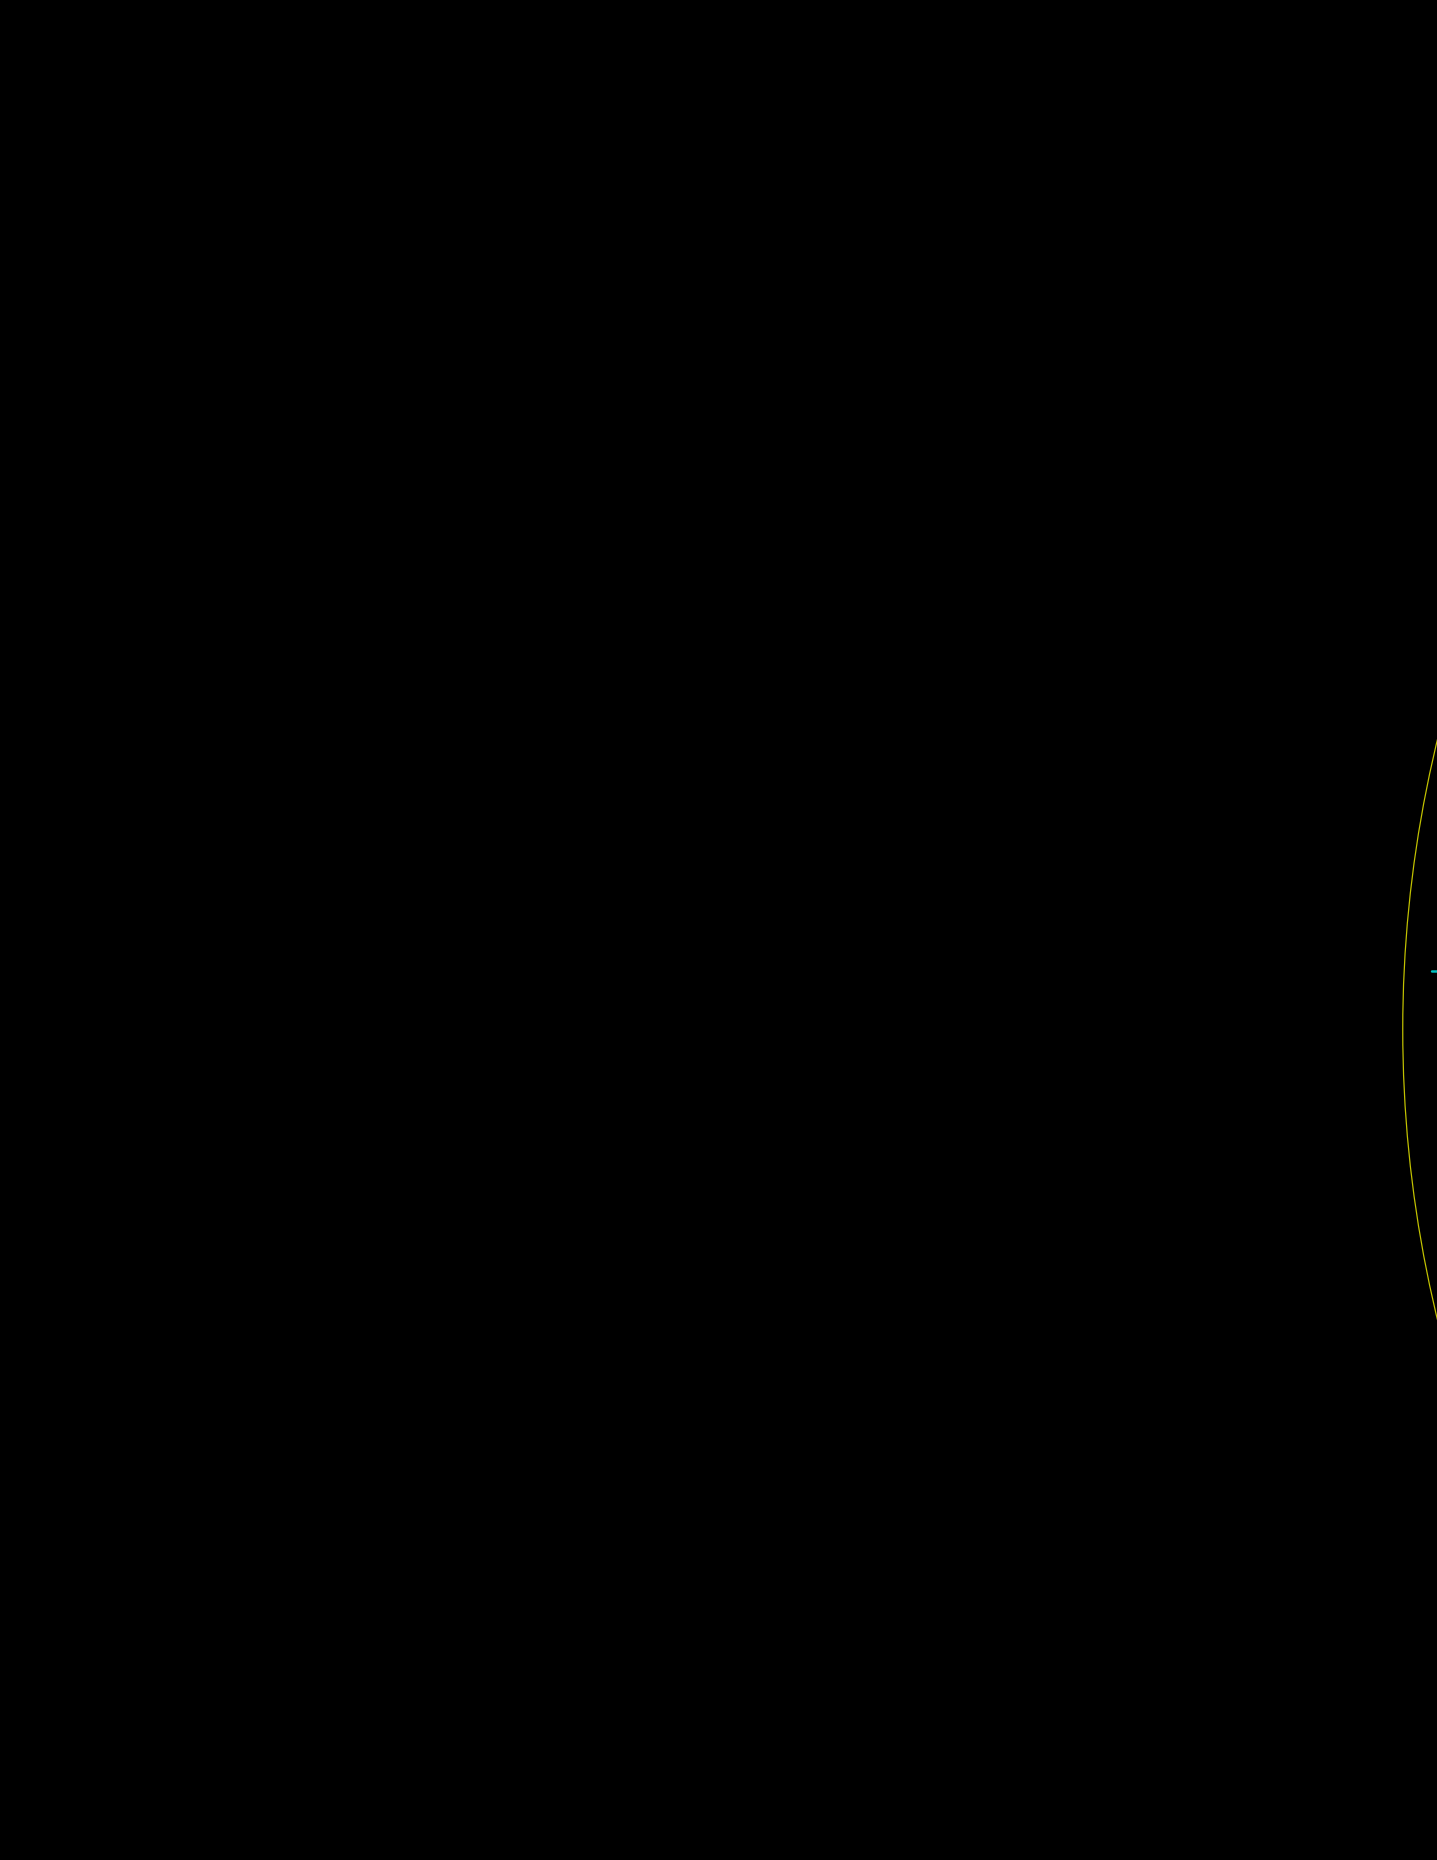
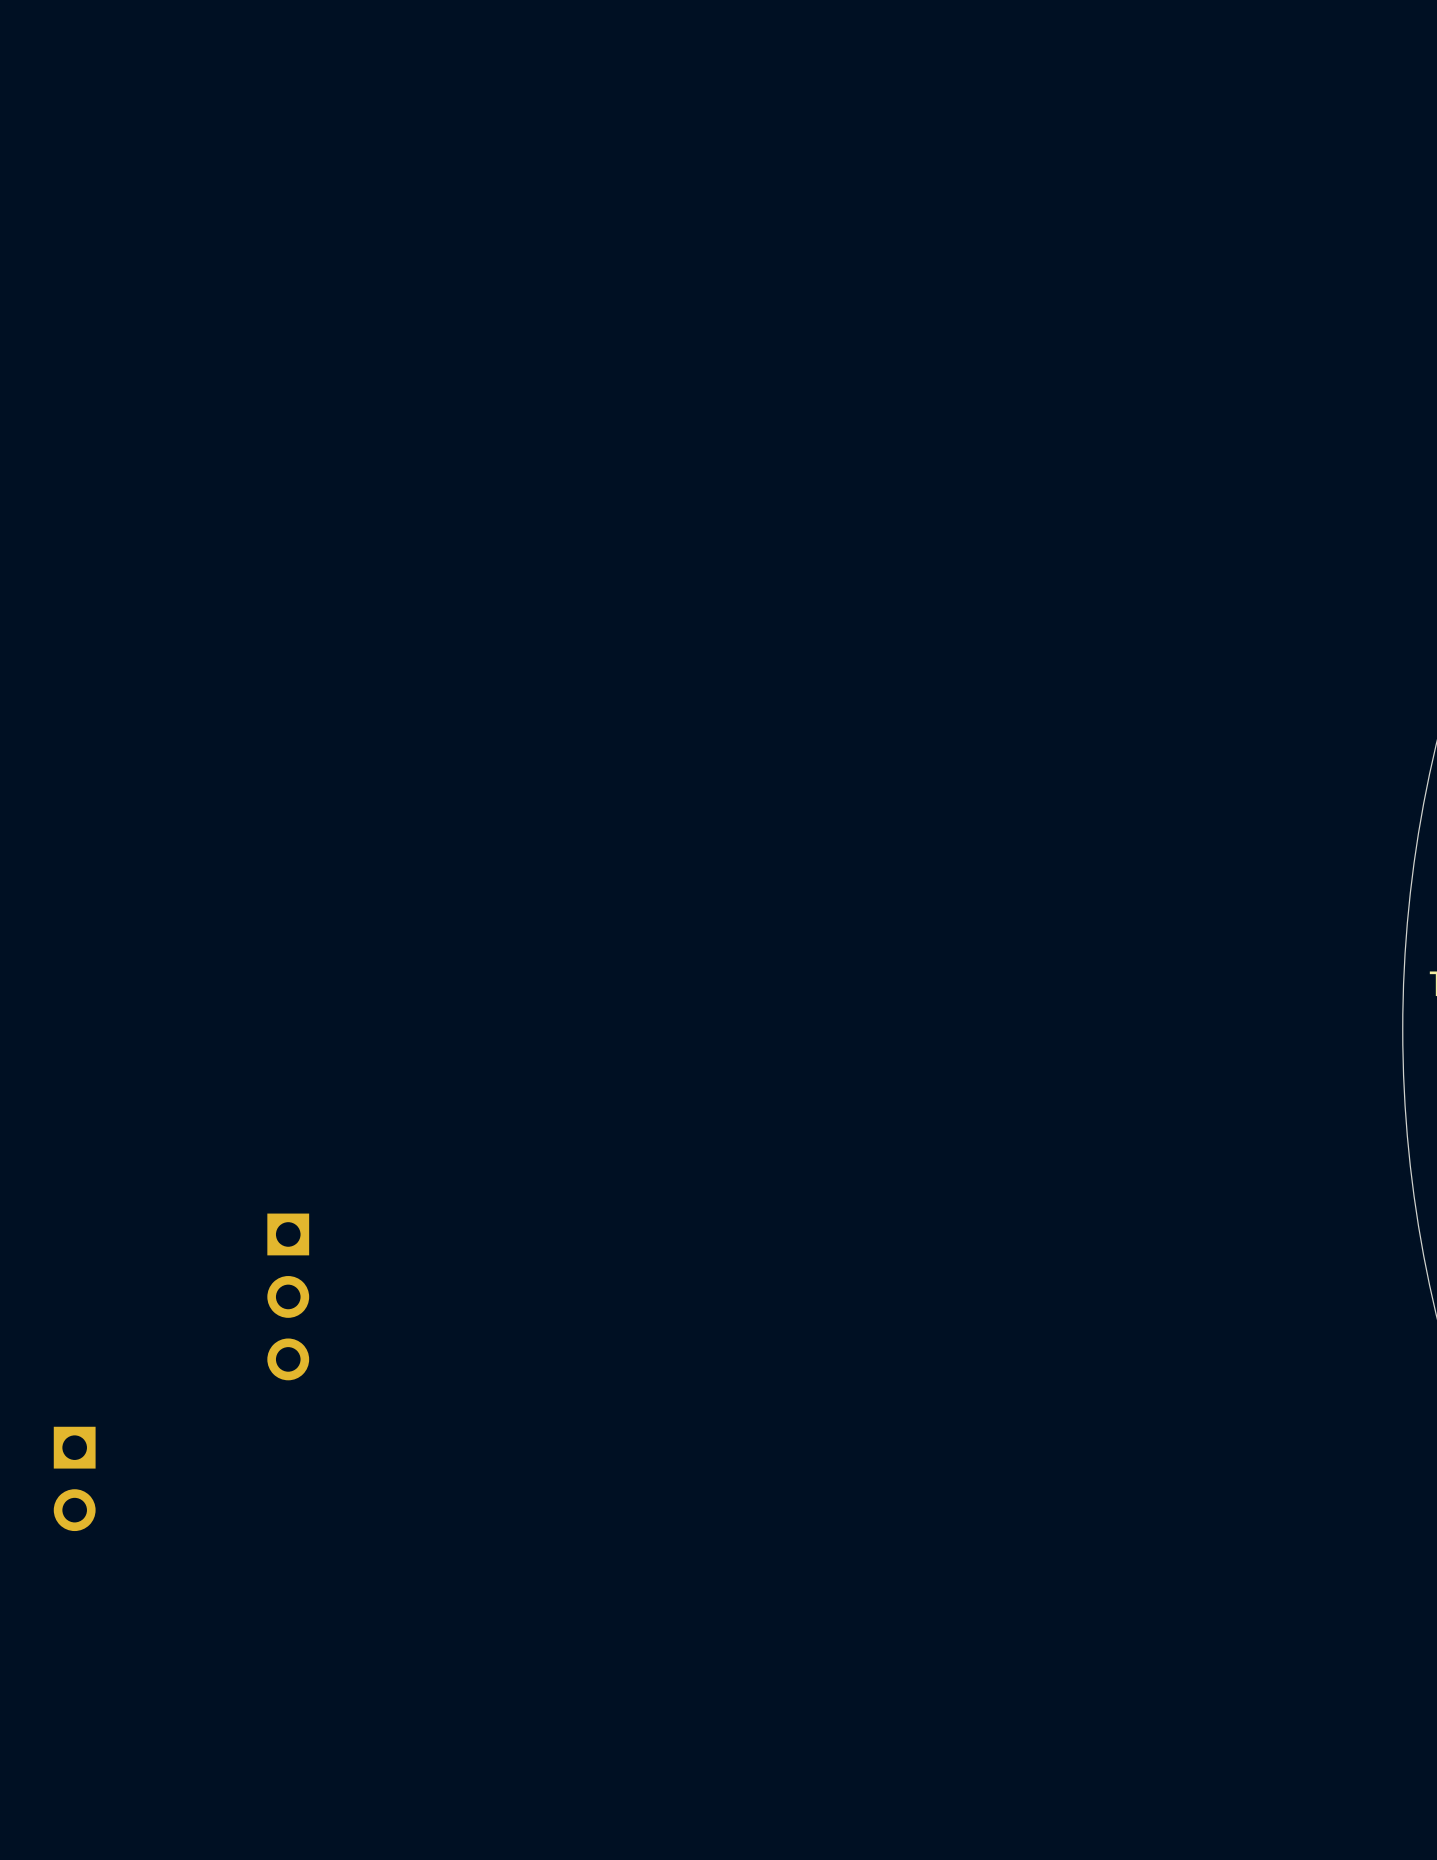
part: none -> (288, 1296)
part: none -> (74, 1478)

